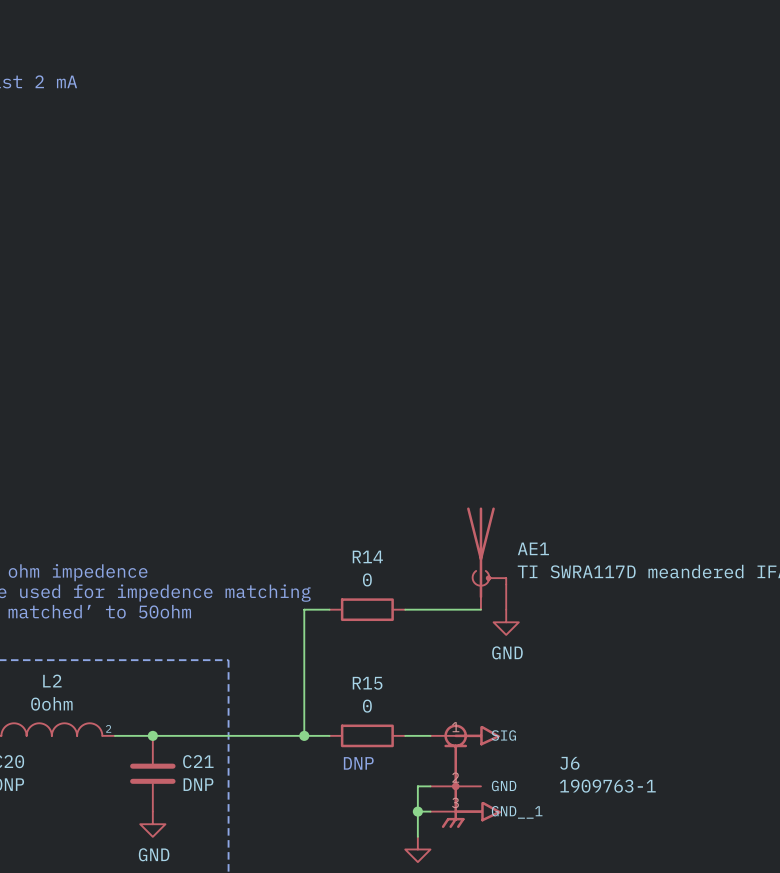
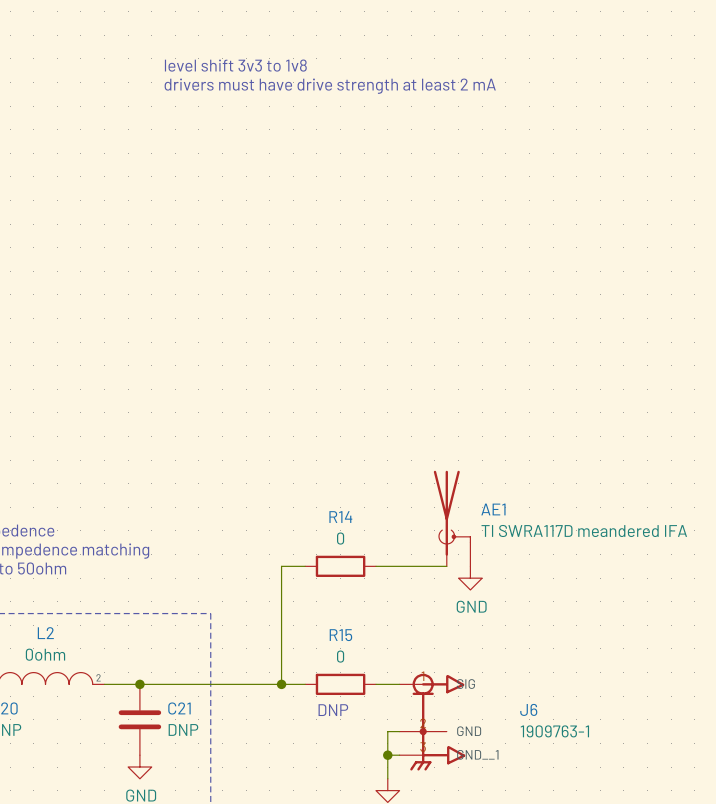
text: none -> level shift 3v3 to 1v8 (235, 65)
text: none -> drivers must have drive strength at least 2 mA (330, 86)

